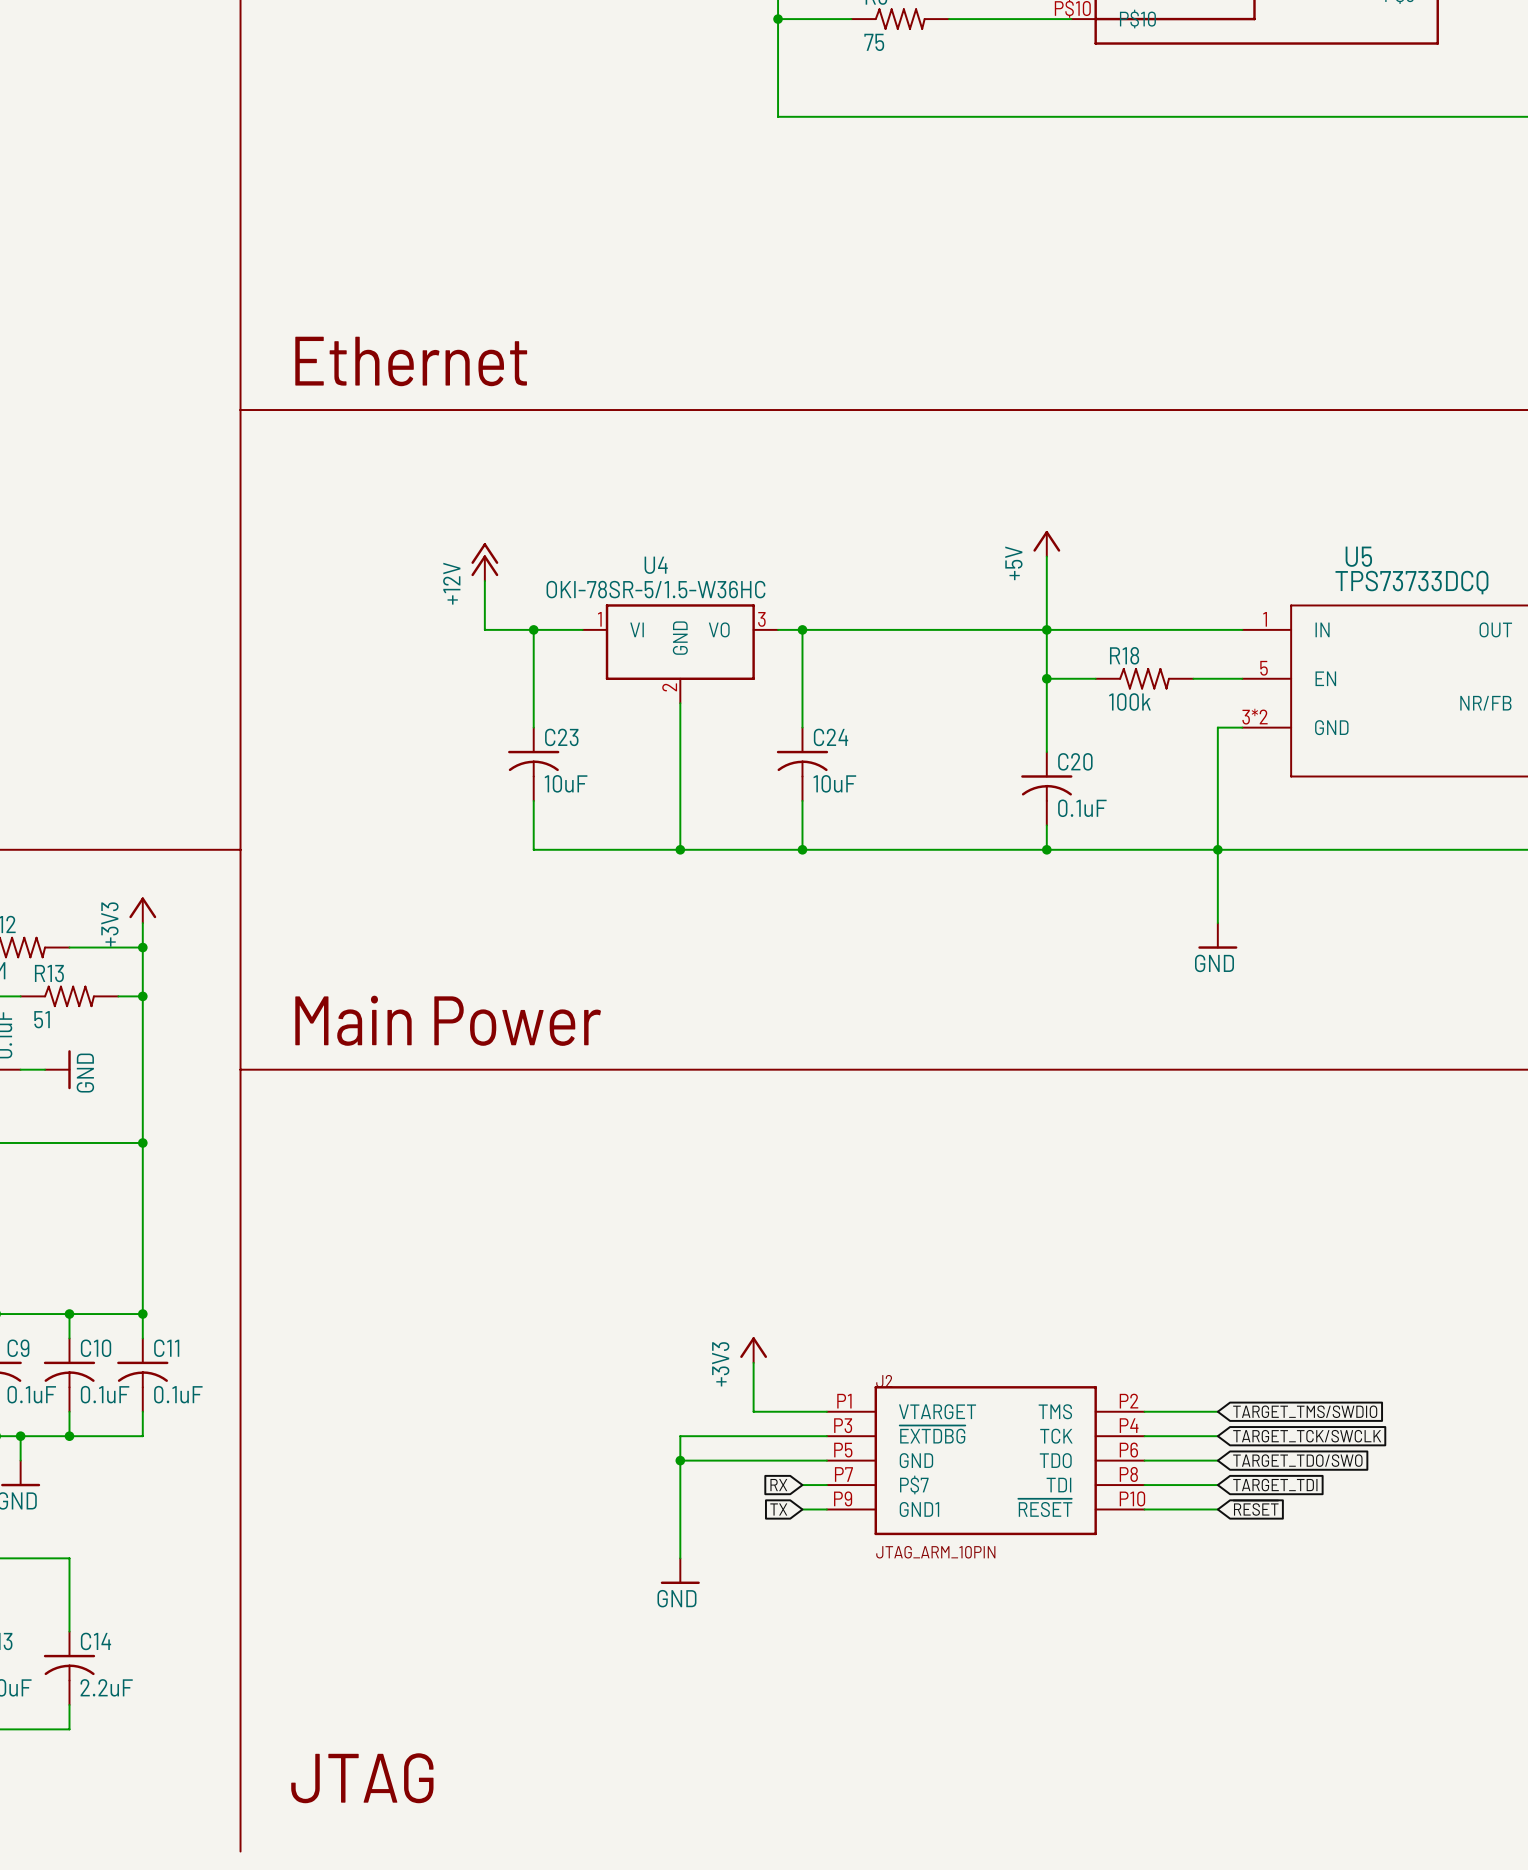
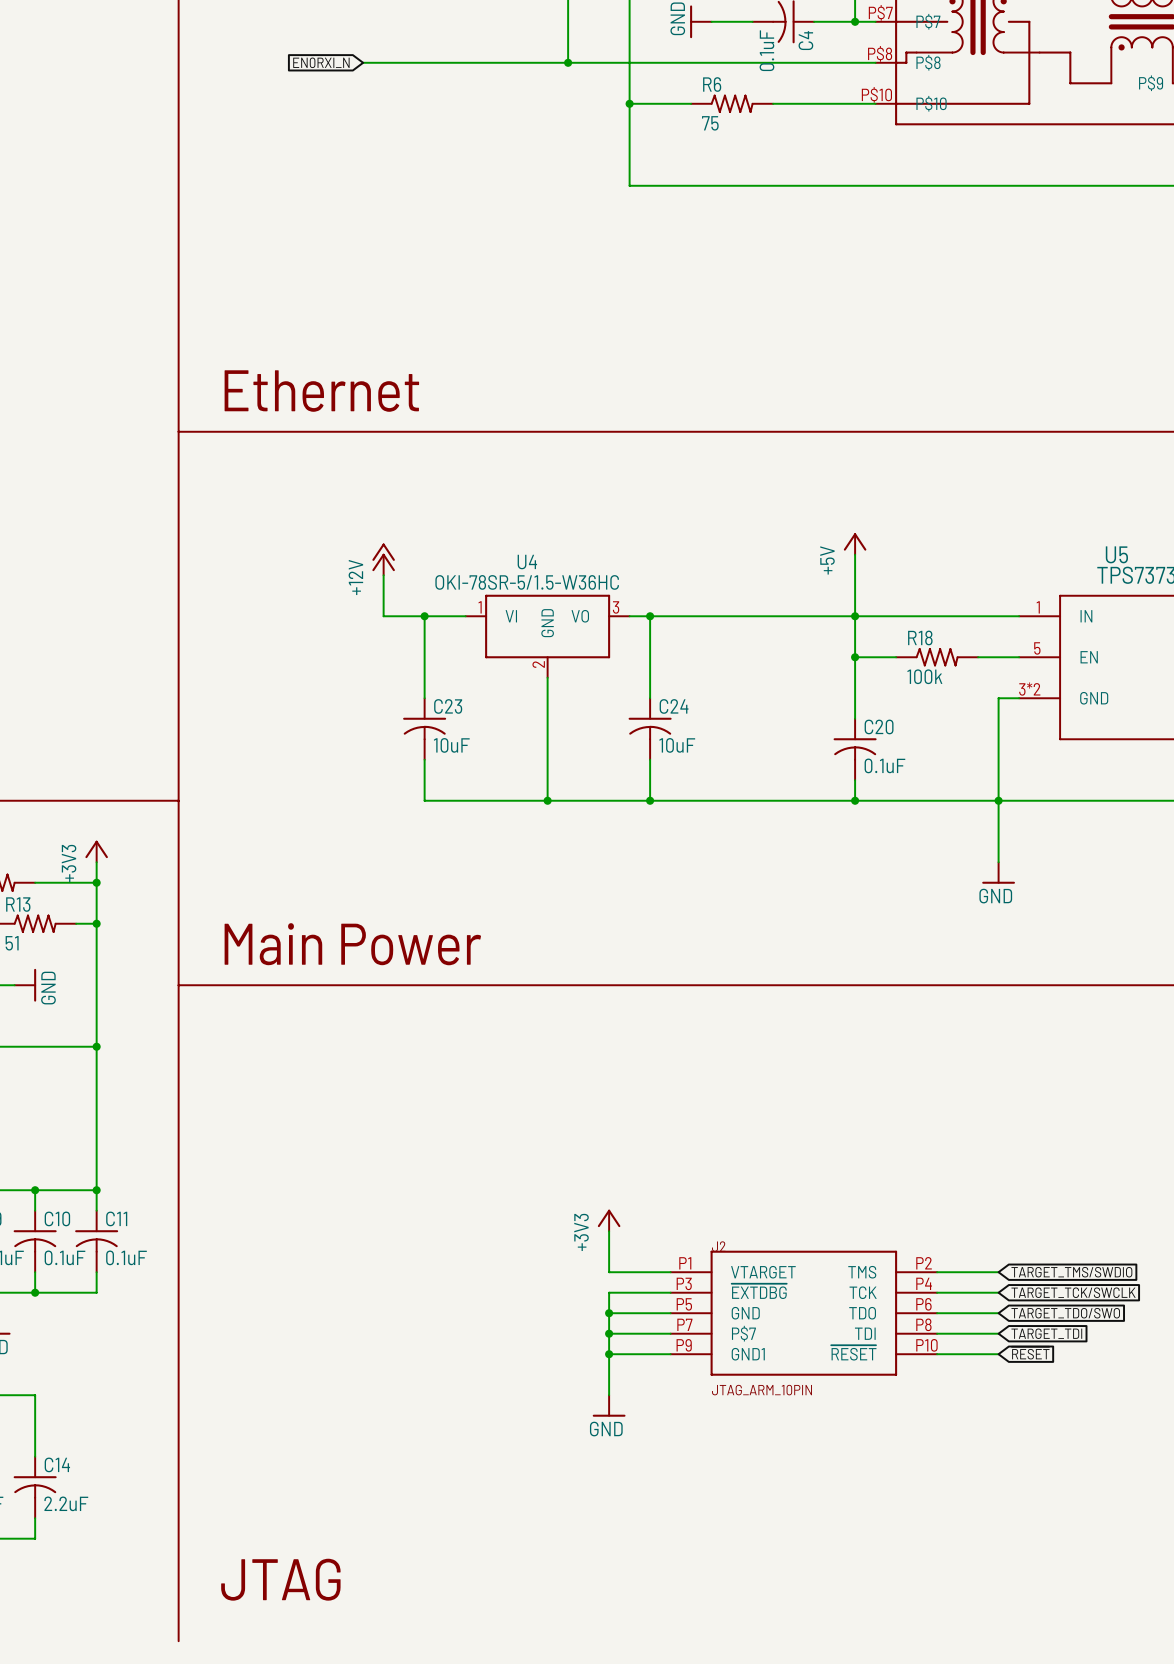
wire: (753, 1436) (680, 1436) (680, 1558) -> (609, 1292) (609, 1395)
wire: (680, 1460) (753, 1460) -> none
junction: (680, 1460) -> none
junction: none -> (609, 1313)
wire: none -> (609, 1333) (650, 1333)
junction: none -> (609, 1333)
global label: RX (778, 1485) -> none
wire: none -> (609, 1354) (650, 1354)
junction: none -> (609, 1354)
global label: TX (778, 1509) -> none
power symbol position: GND (680, 1571) -> GND (609, 1405)

